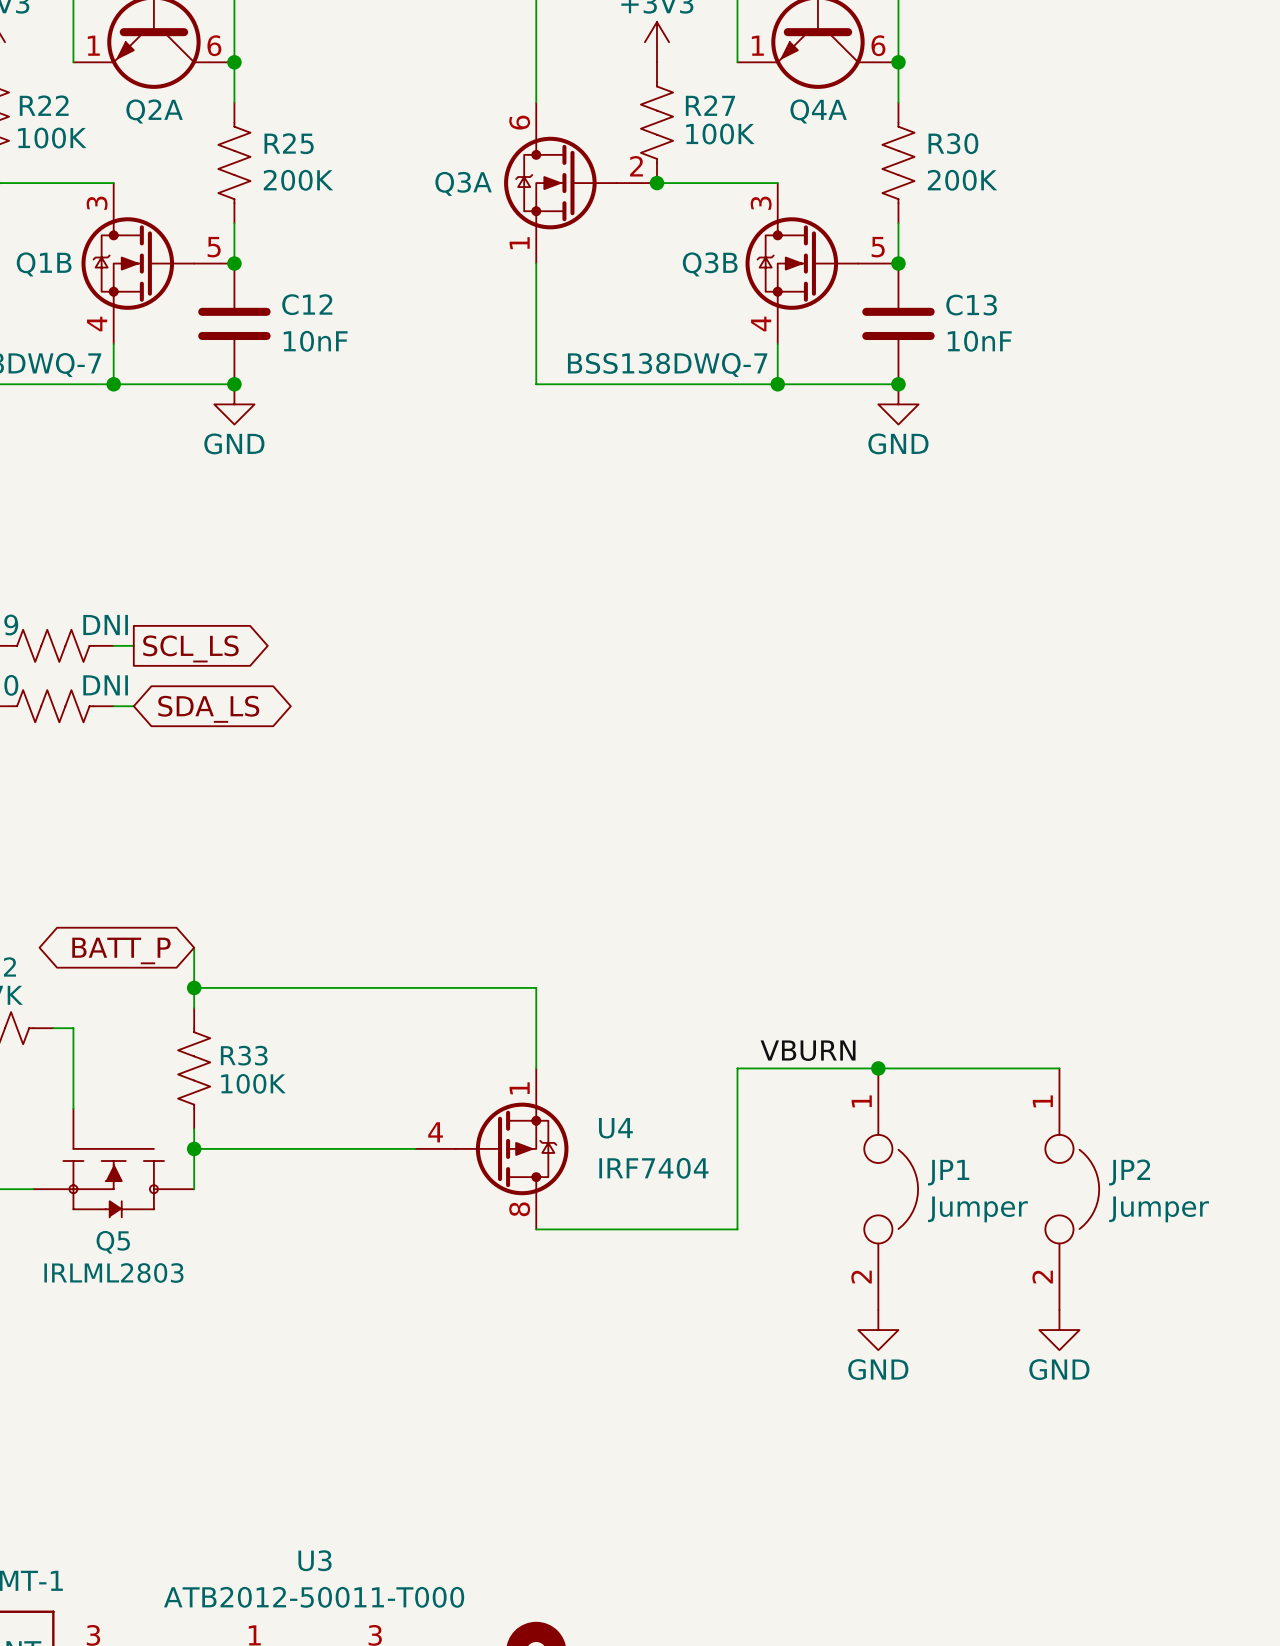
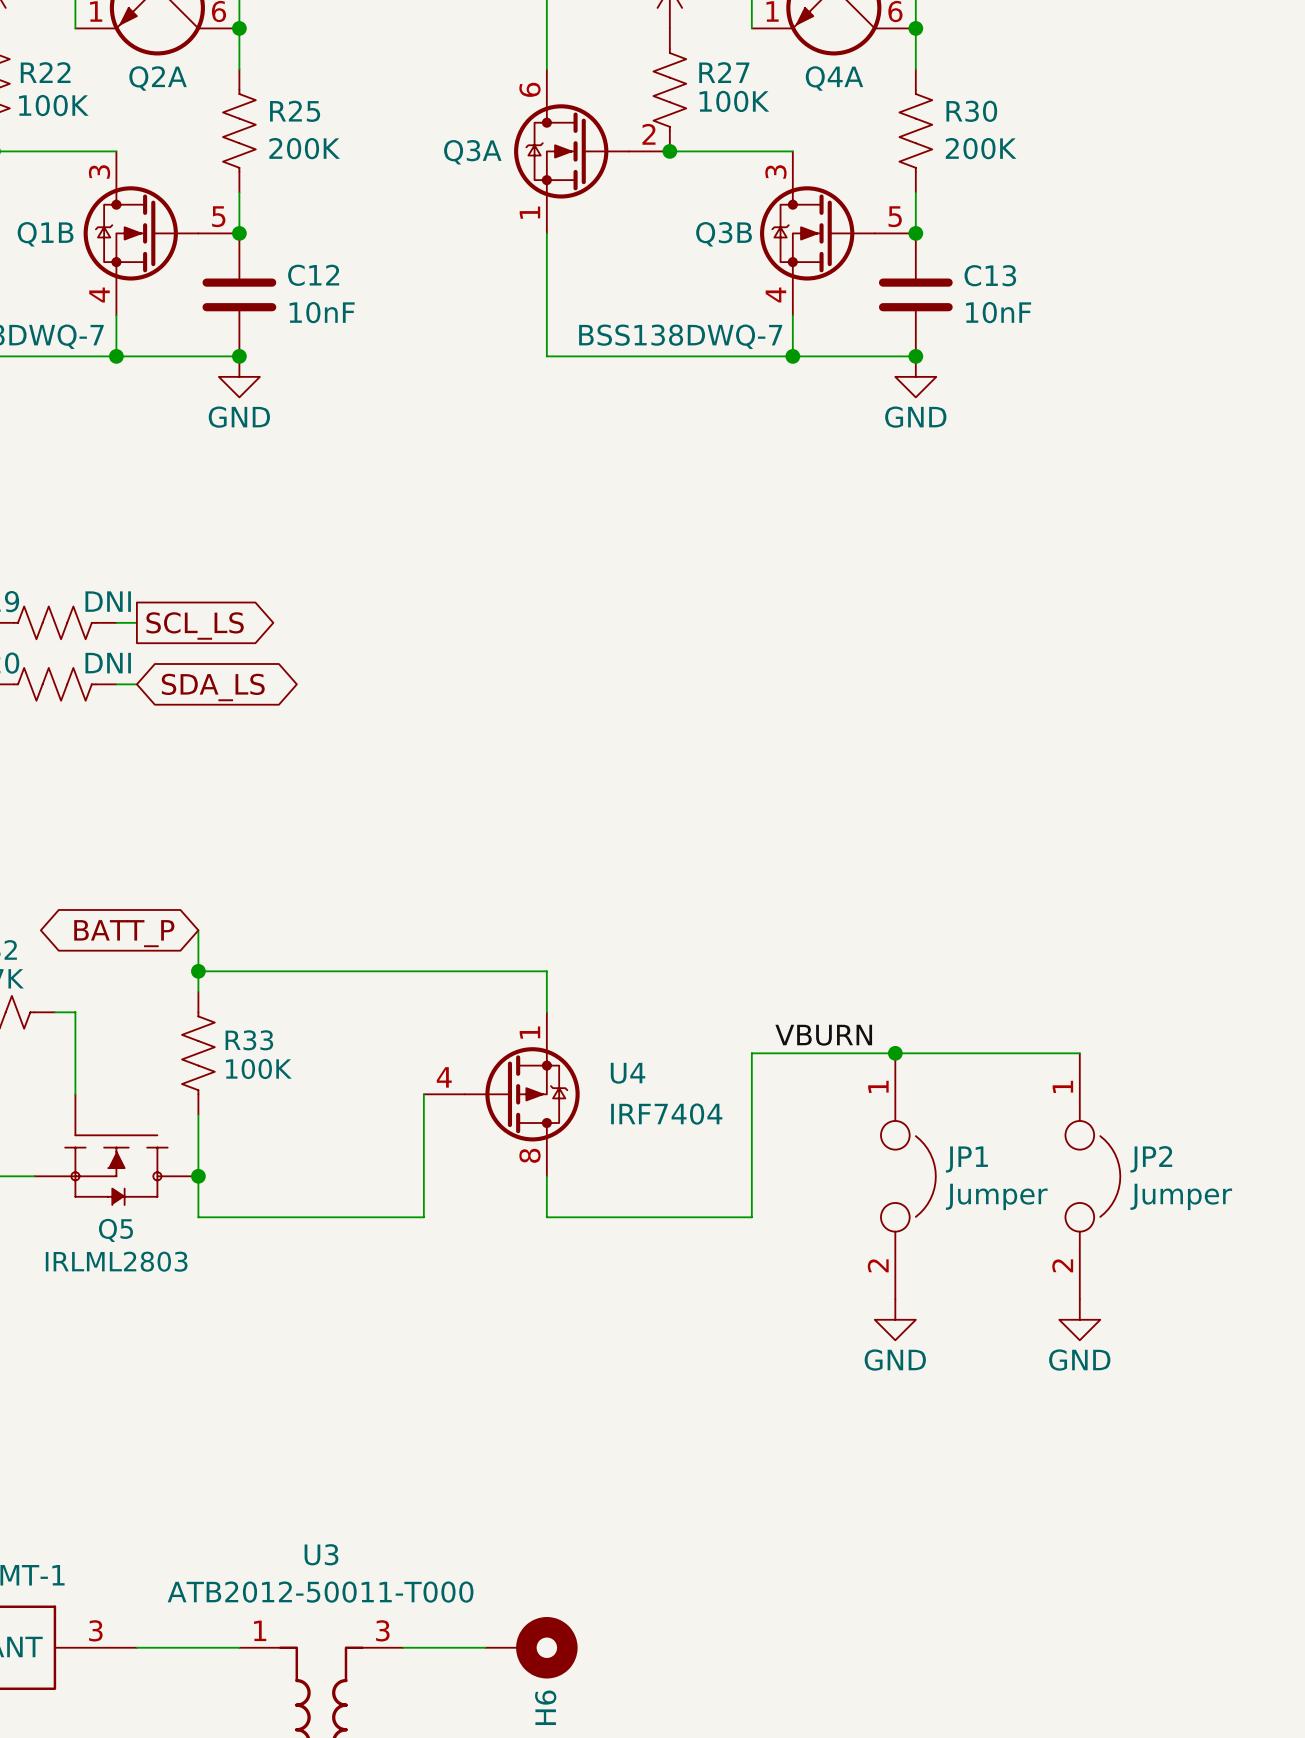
wire: none -> (423, 1094) (423, 1217) (198, 1217) (198, 1176)
wire: (194, 1148) (415, 1148) -> none
junction position: (194, 1148) -> (198, 1176)
U4 position: (491, 1148) -> (501, 1094)

